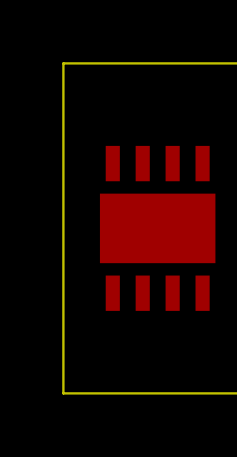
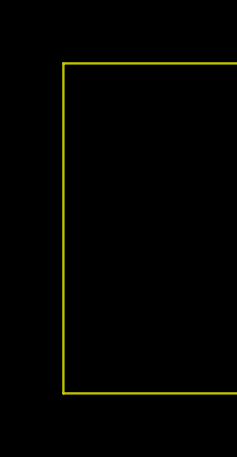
part: (157, 228) -> none

